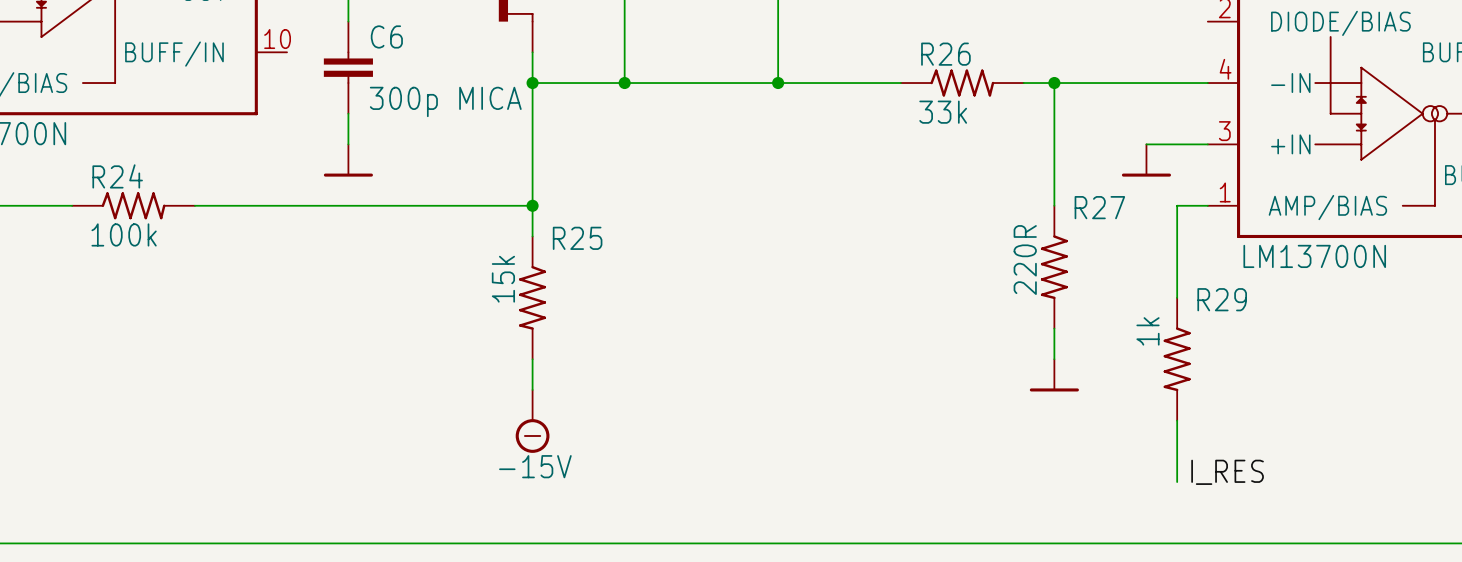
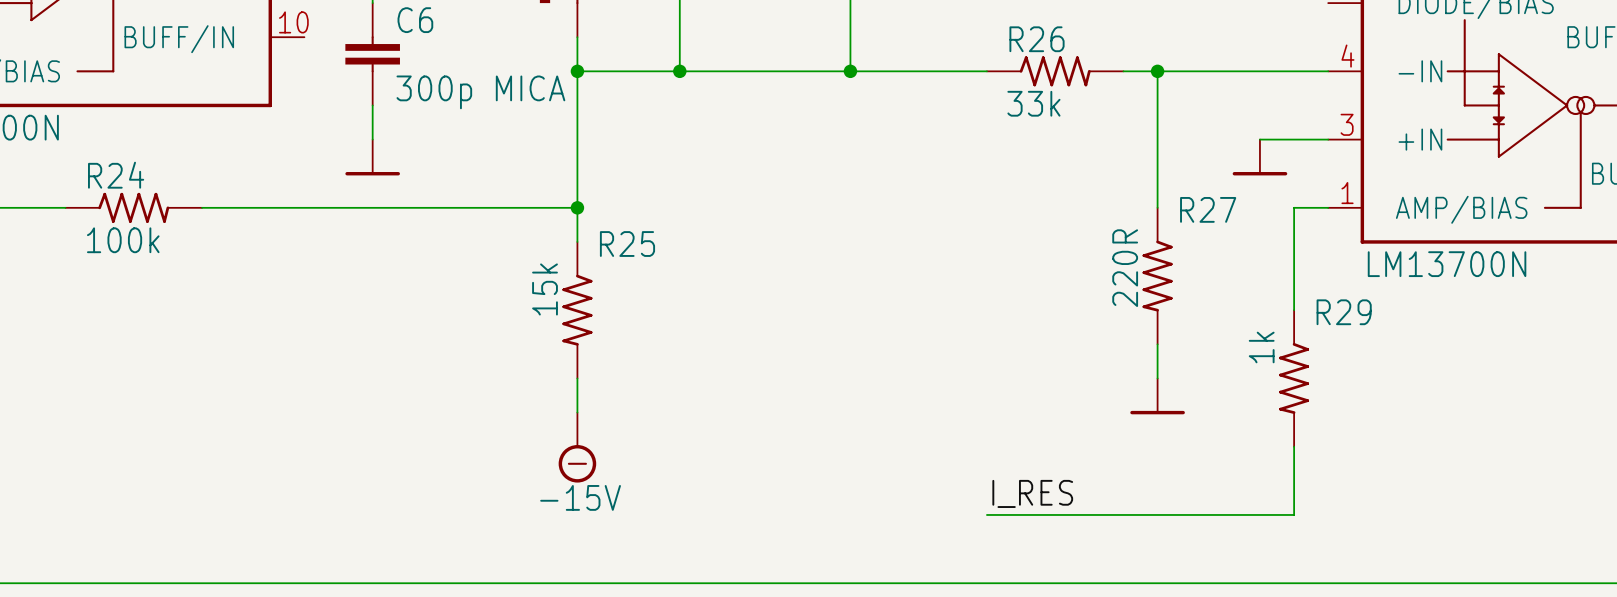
label position: I_RES (1227, 472) -> I_RES (1032, 493)
wire: none -> (986, 514) (1294, 514)

